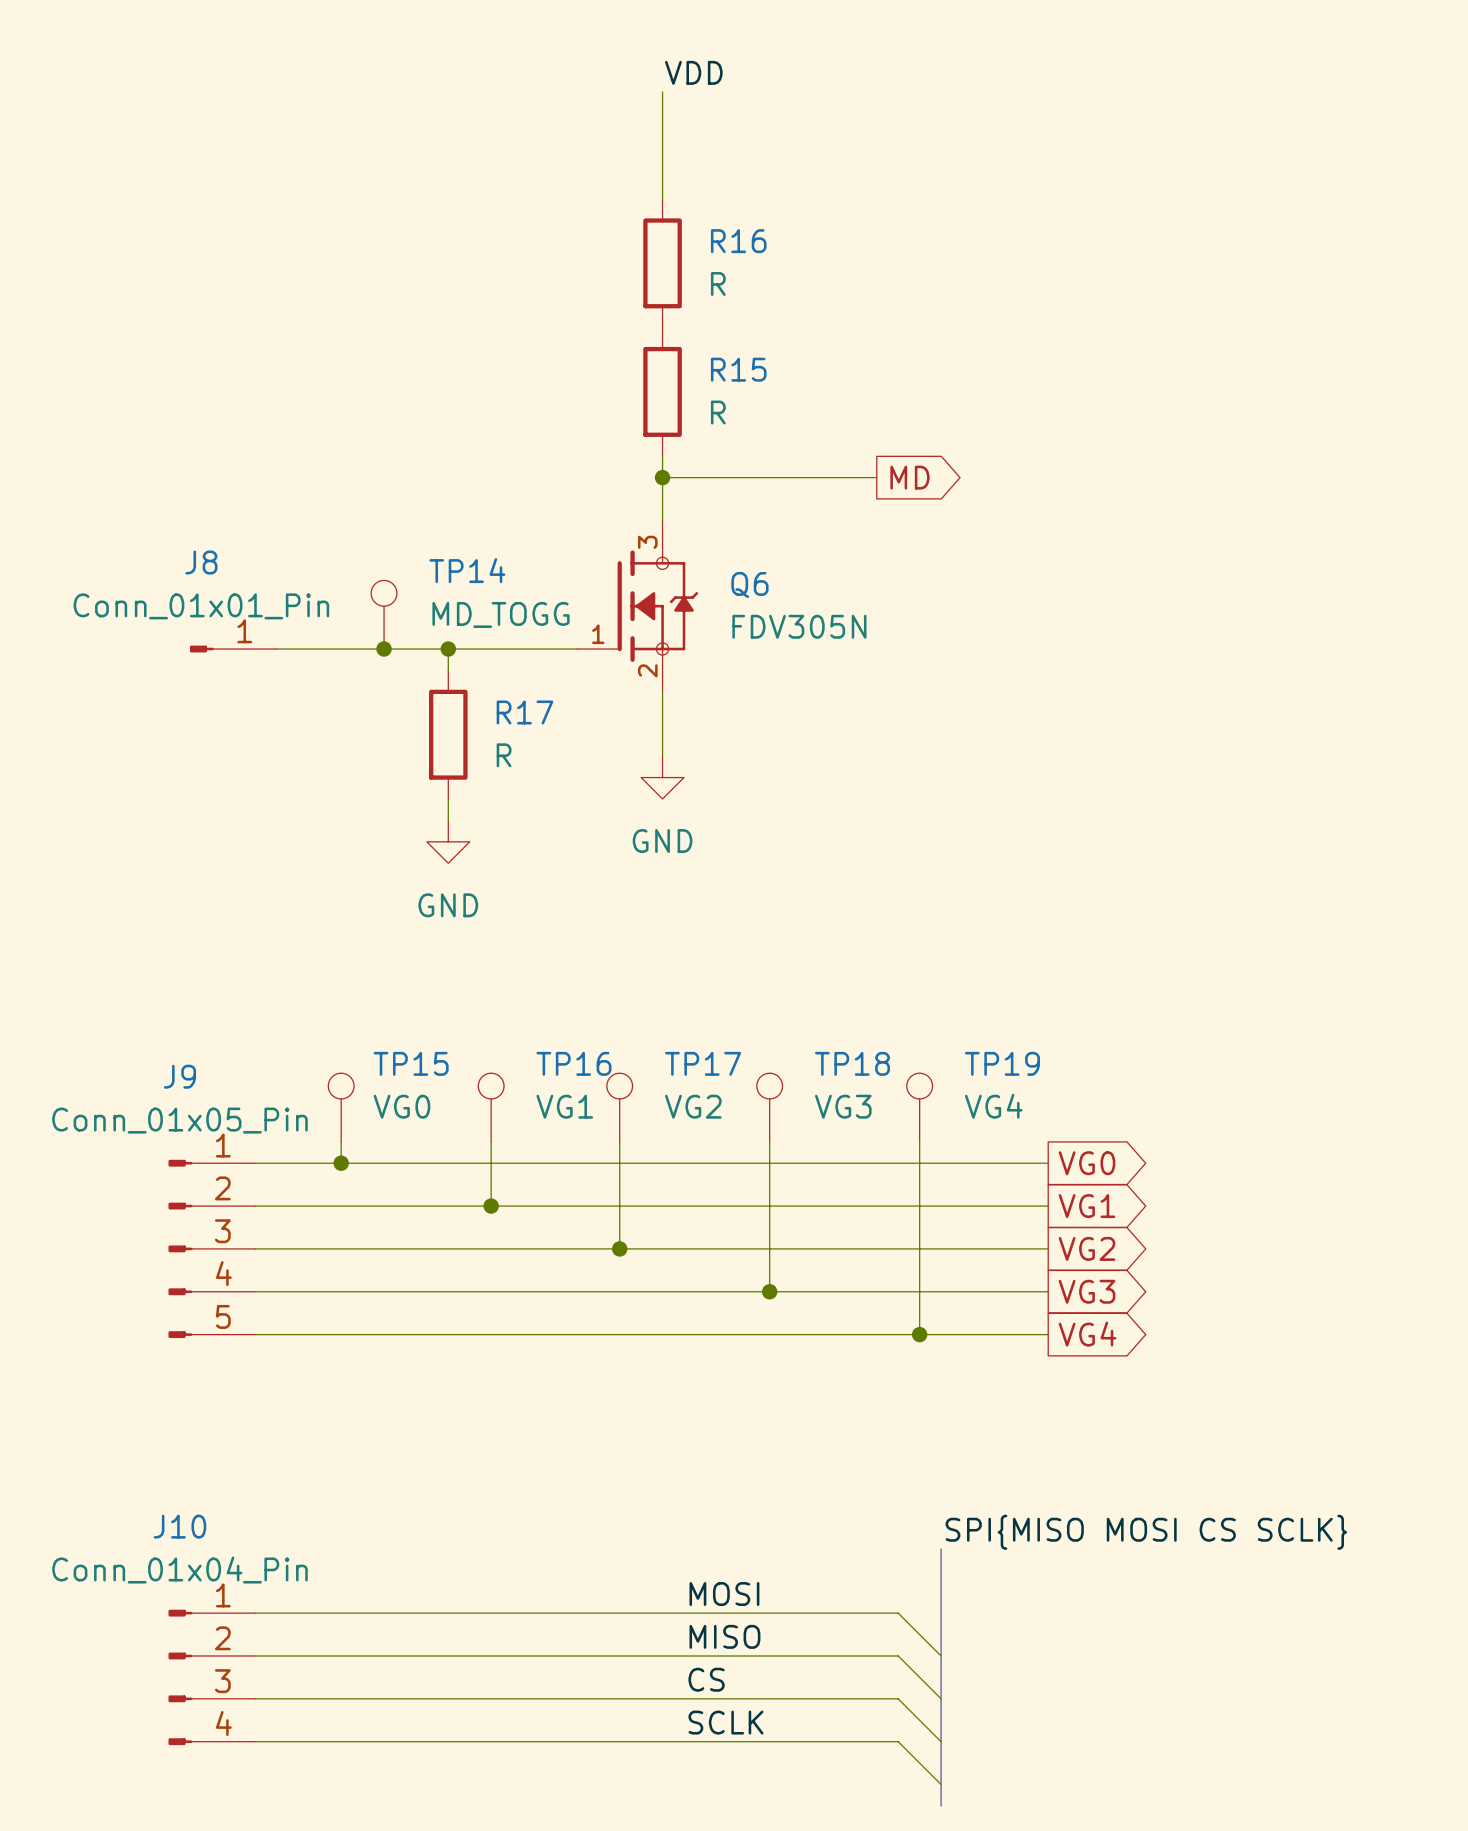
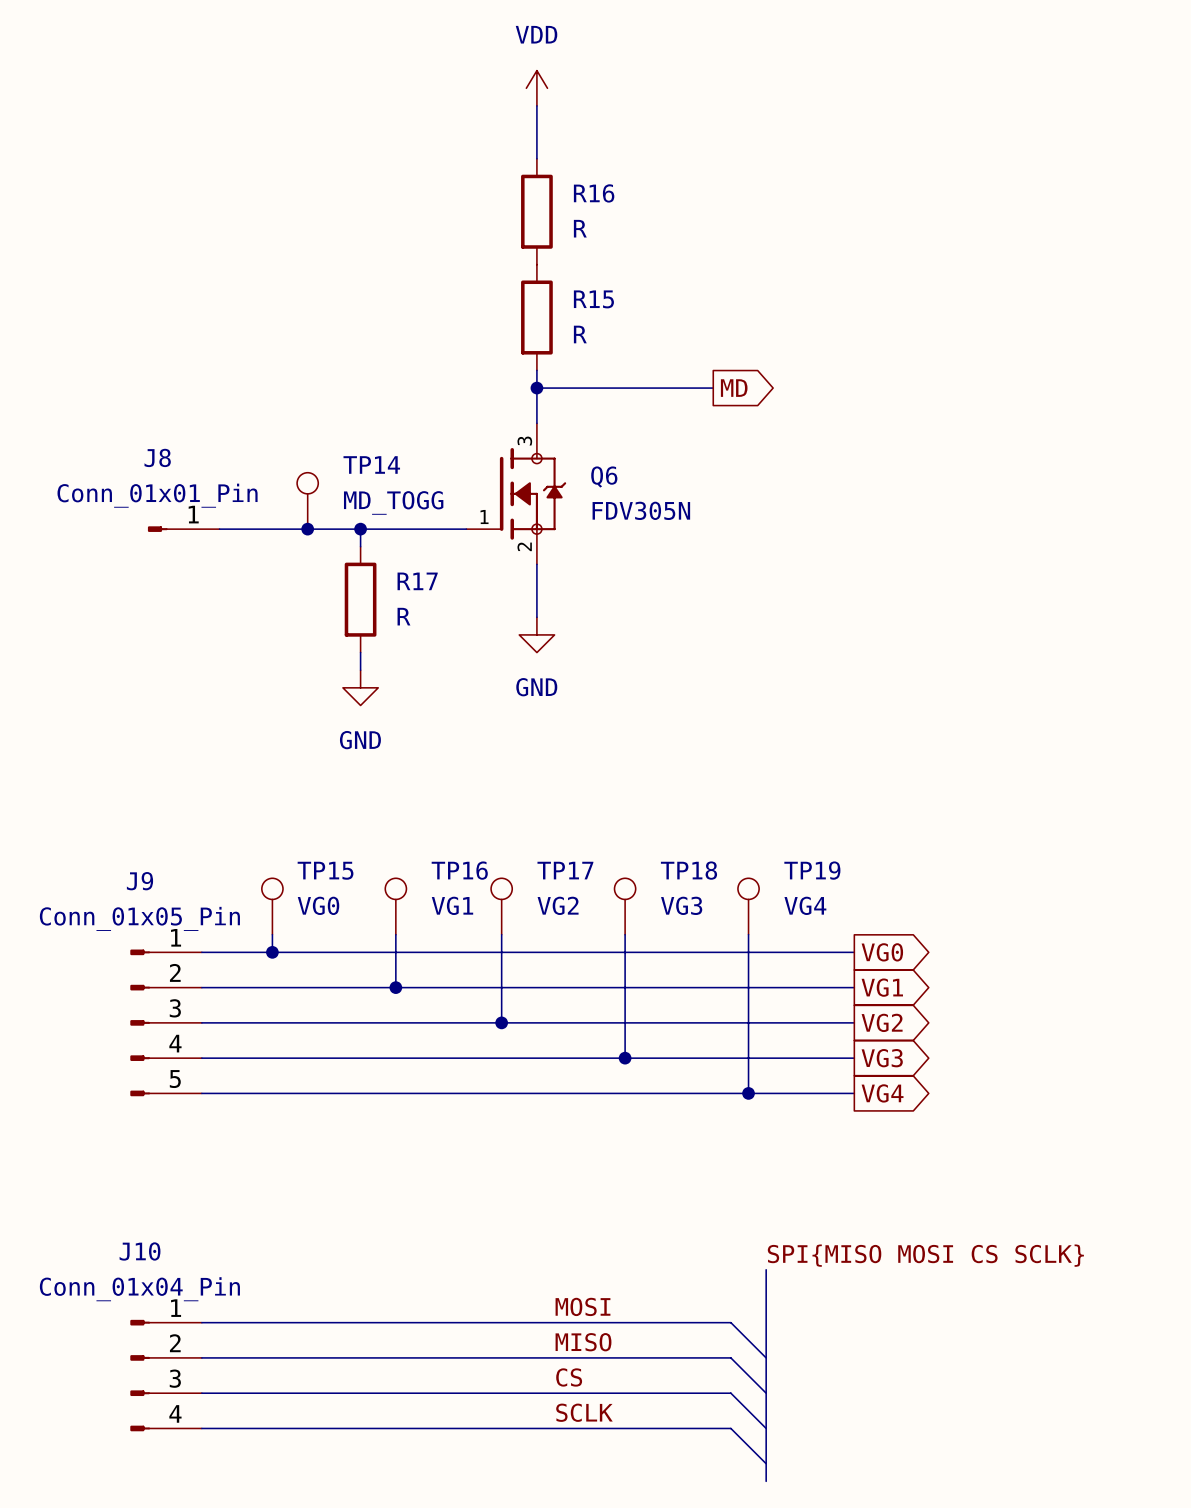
label: VDD (693, 72) -> none
power symbol: none -> VDD (536, 88)

